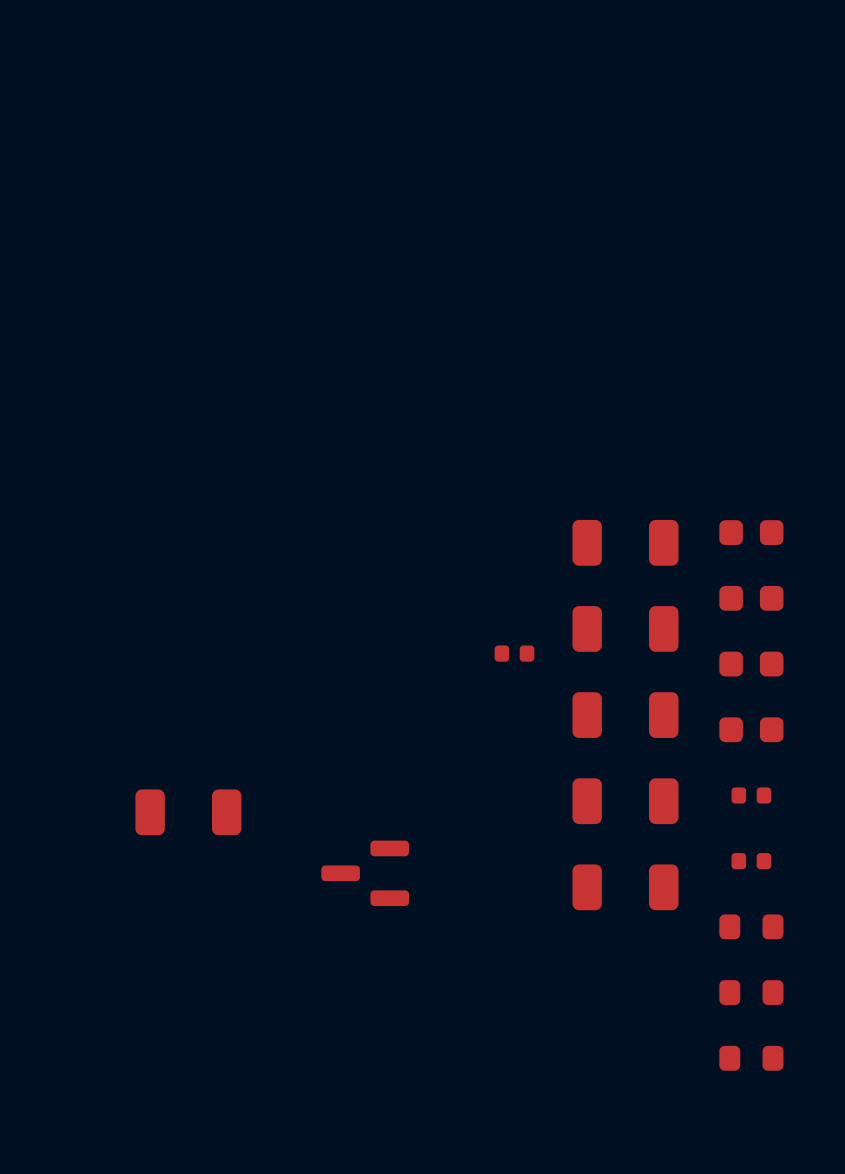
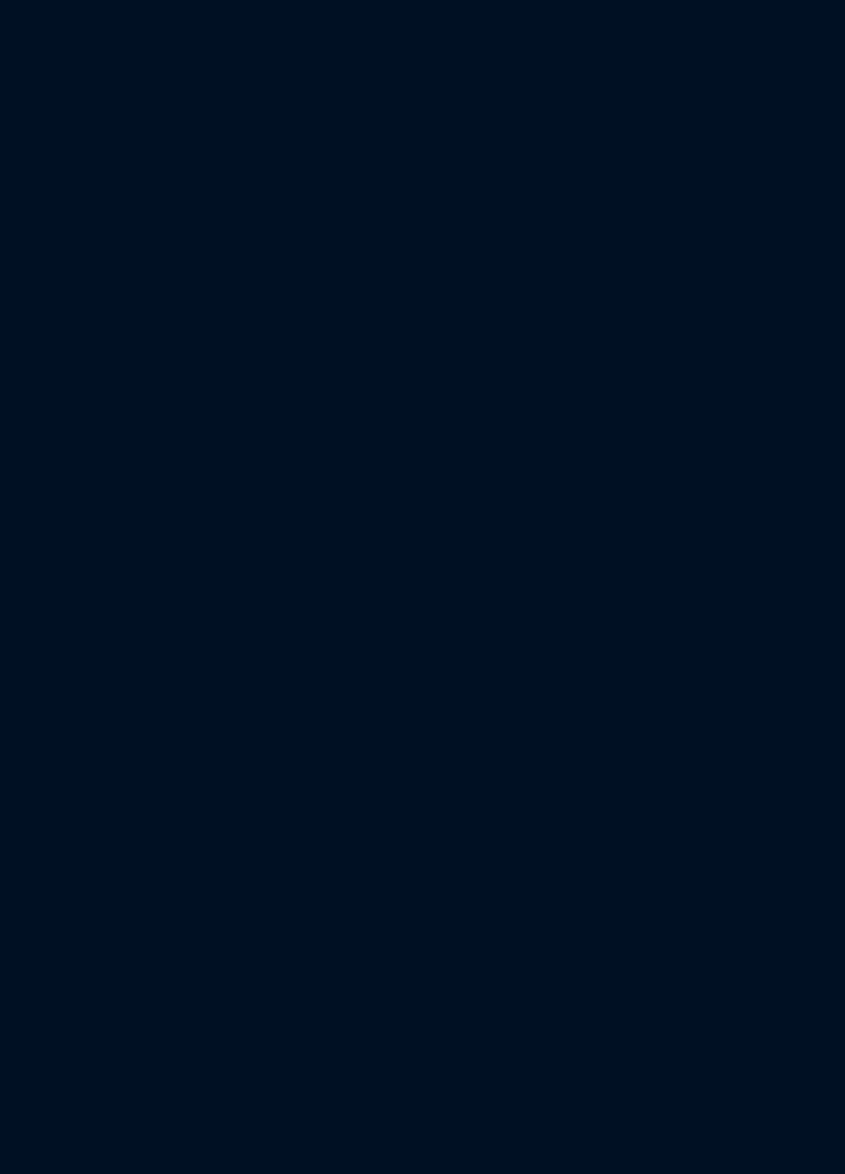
part: (751, 532) -> none
part: (625, 542) -> none
part: (751, 598) -> none
part: (625, 628) -> none
part: (514, 653) -> none
part: (751, 664) -> none
part: (625, 715) -> none
part: (751, 729) -> none
part: (751, 795) -> none
part: (625, 801) -> none
part: (188, 812) -> none
part: (751, 861) -> none
part: (365, 873) -> none
part: (625, 887) -> none
part: (751, 926) -> none
part: (751, 992) -> none
part: (751, 1058) -> none

